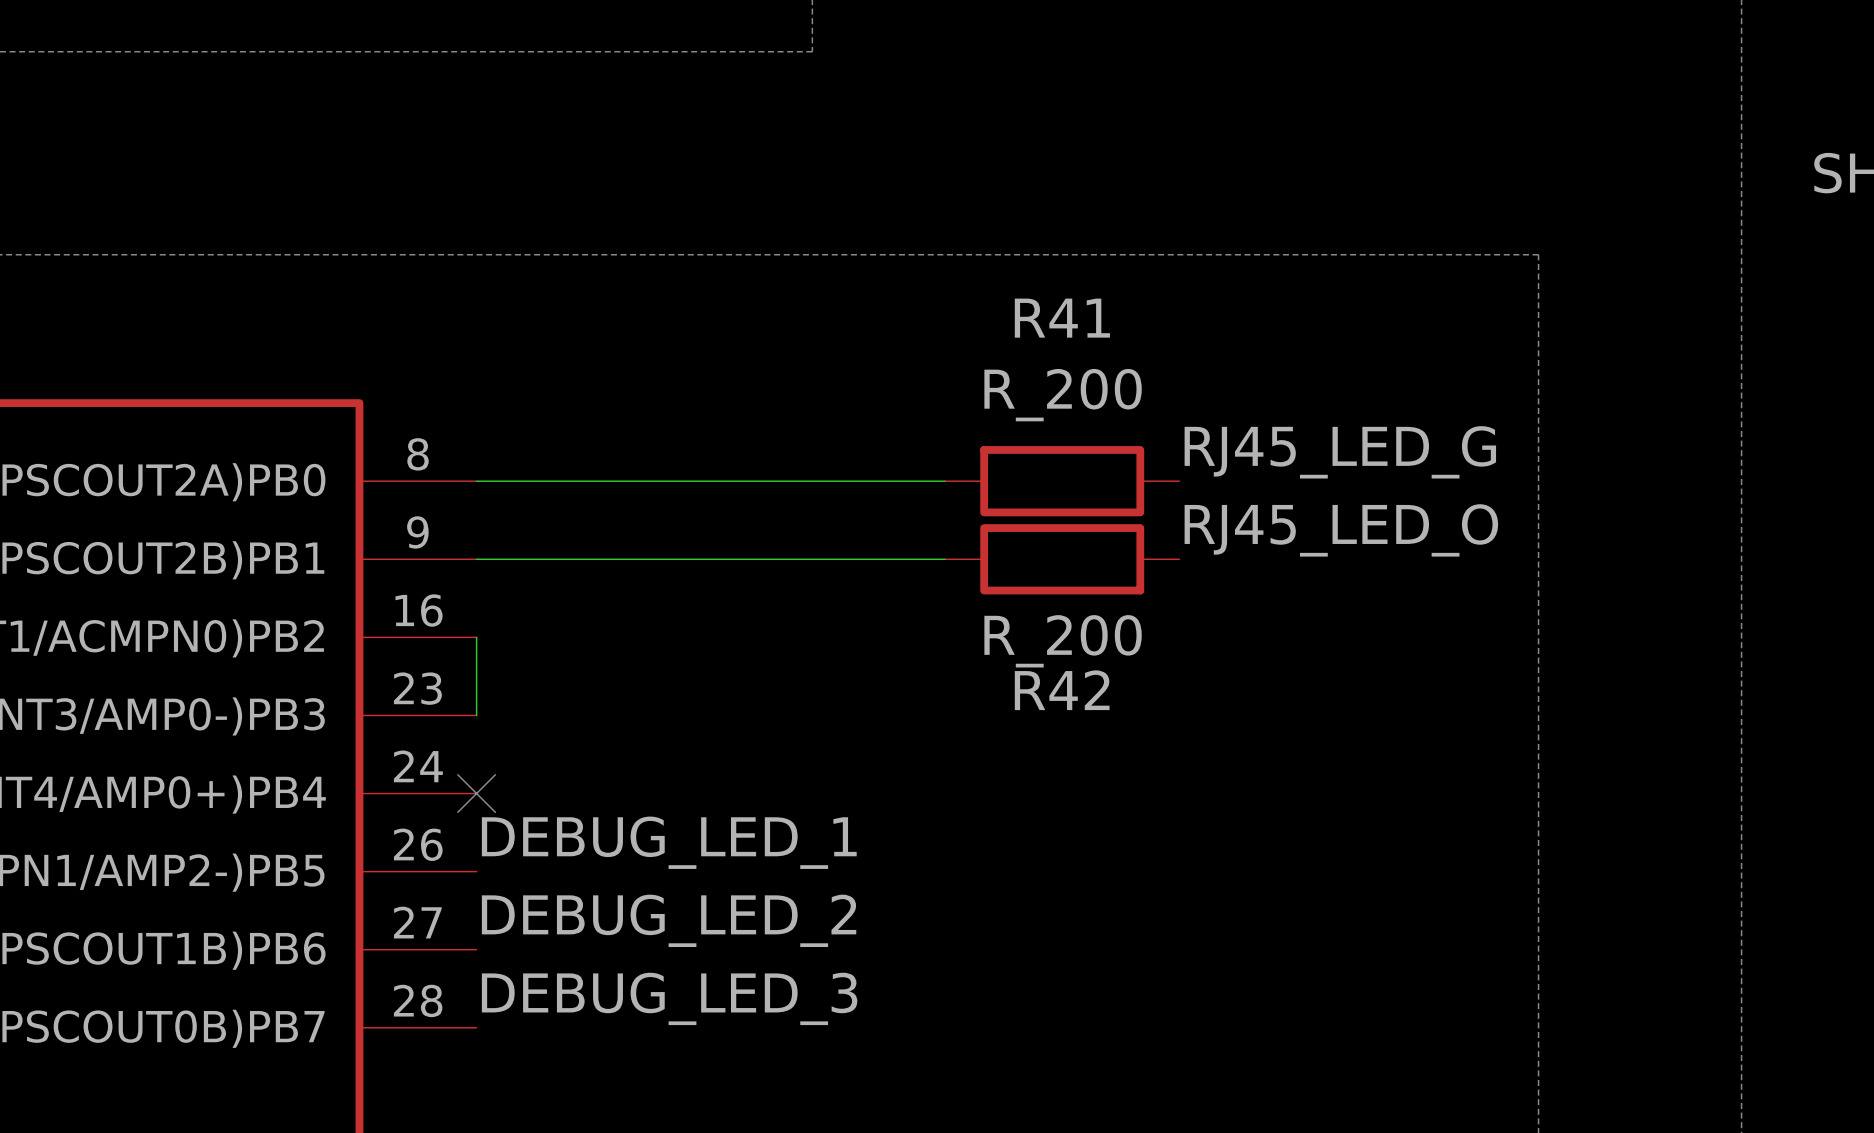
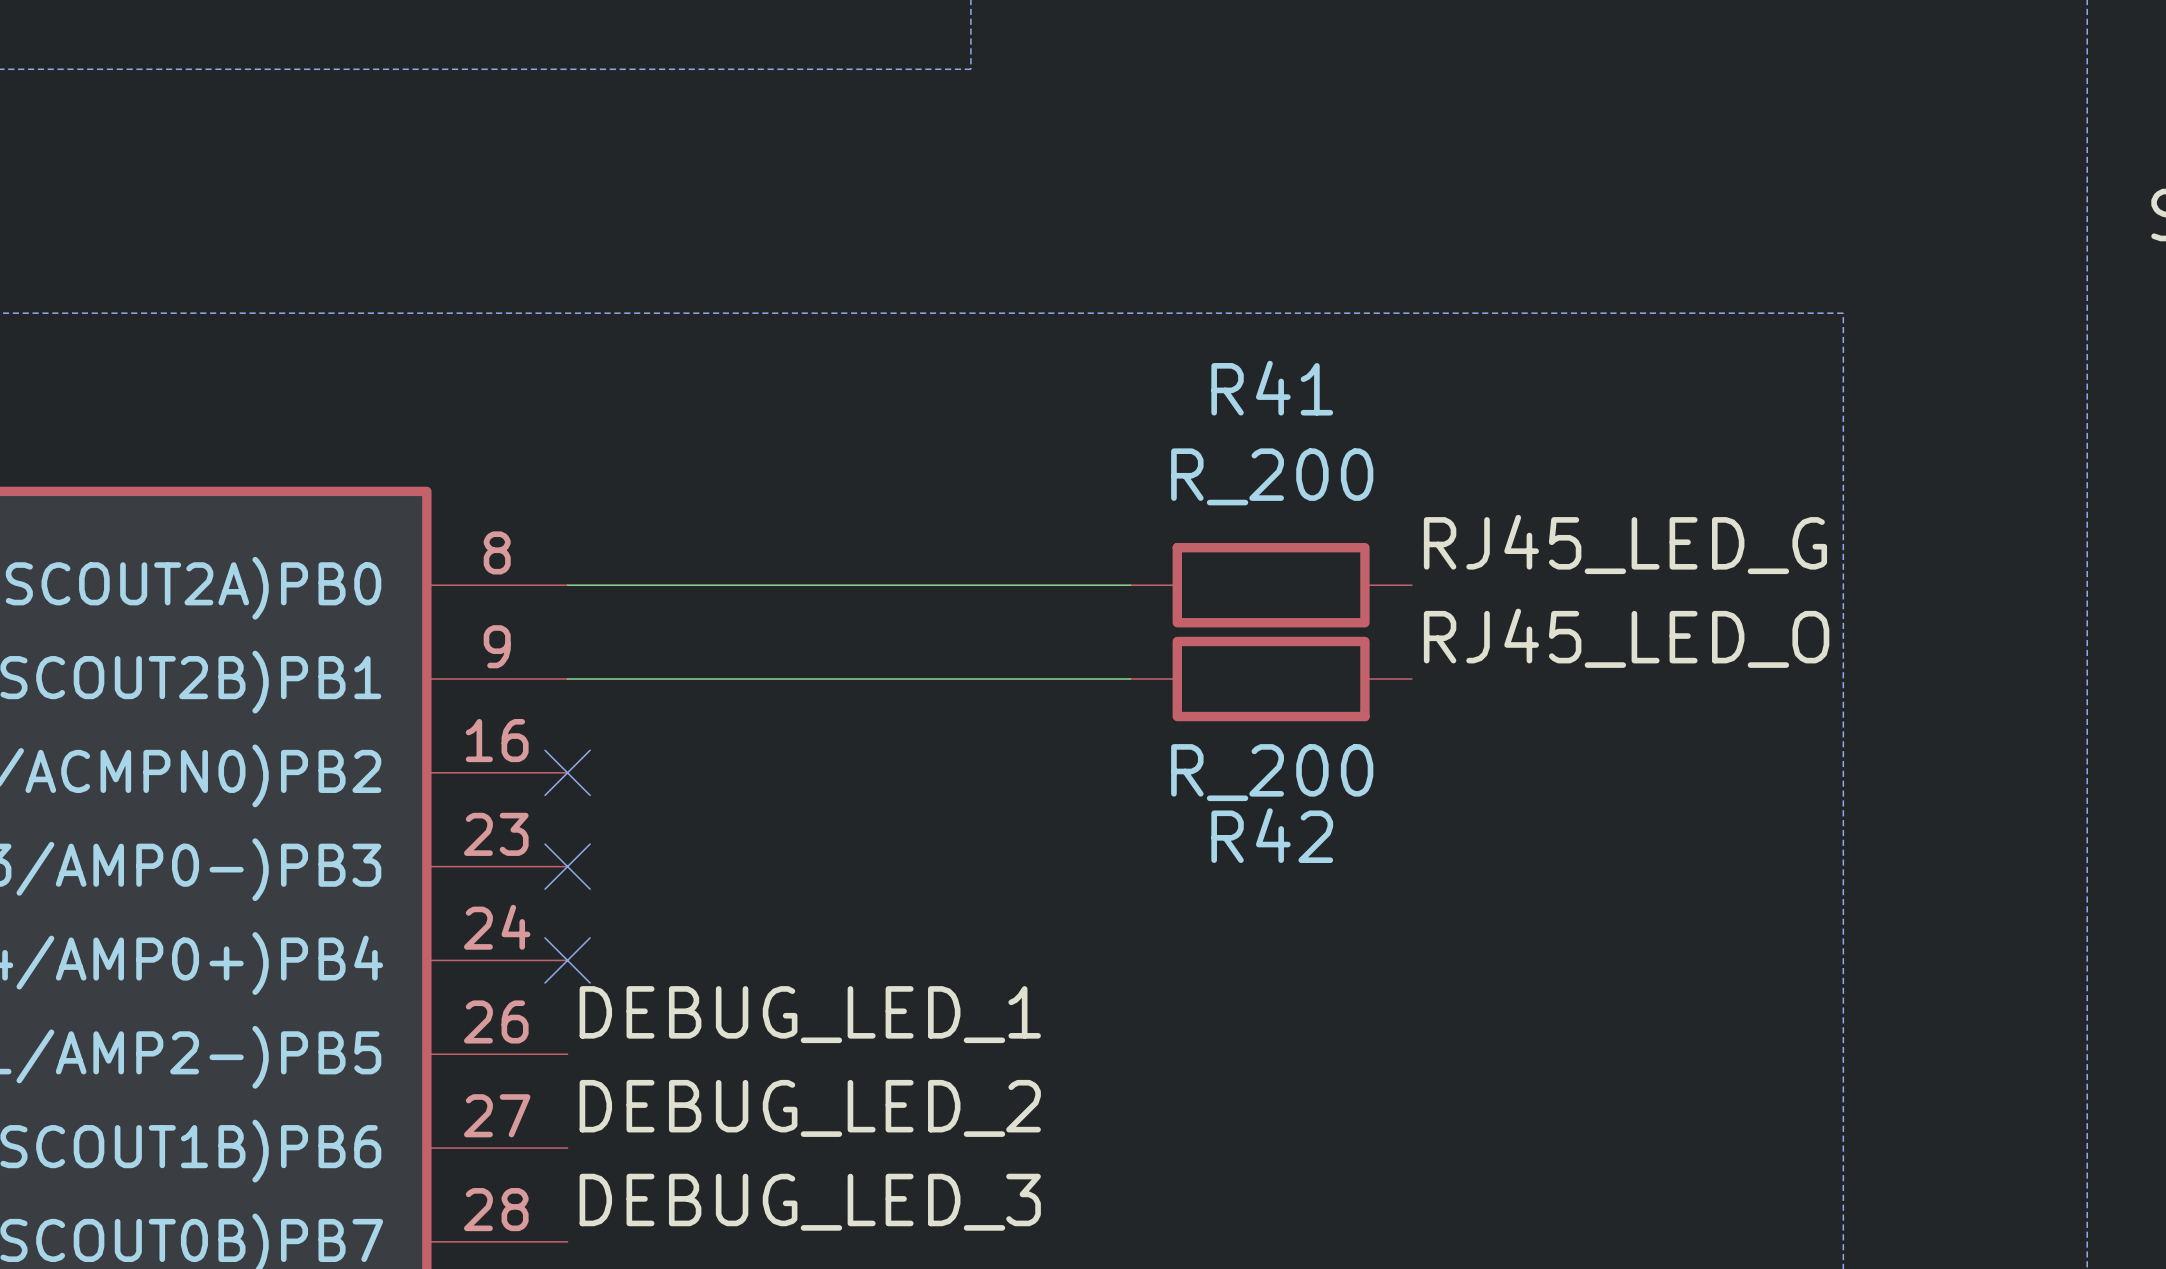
wire: (476, 637) (476, 715) -> none
no-connect mark: none -> (567, 772)
no-connect mark: none -> (567, 866)

